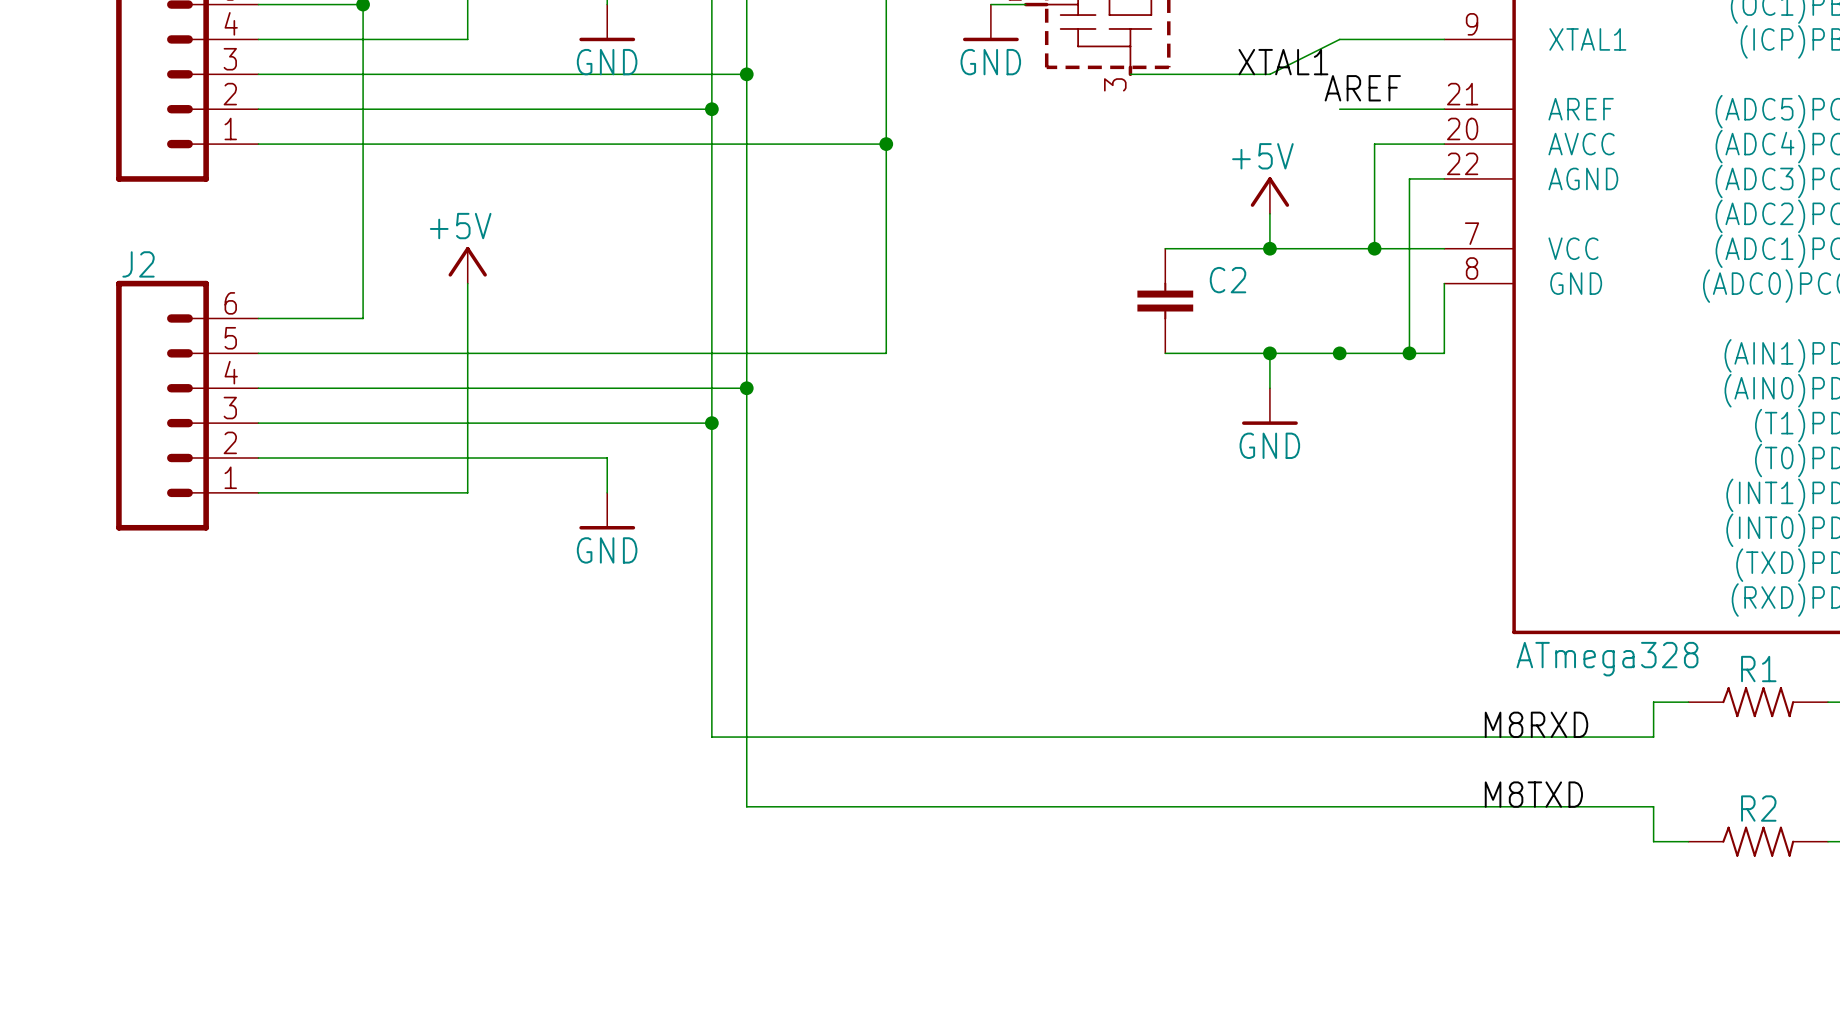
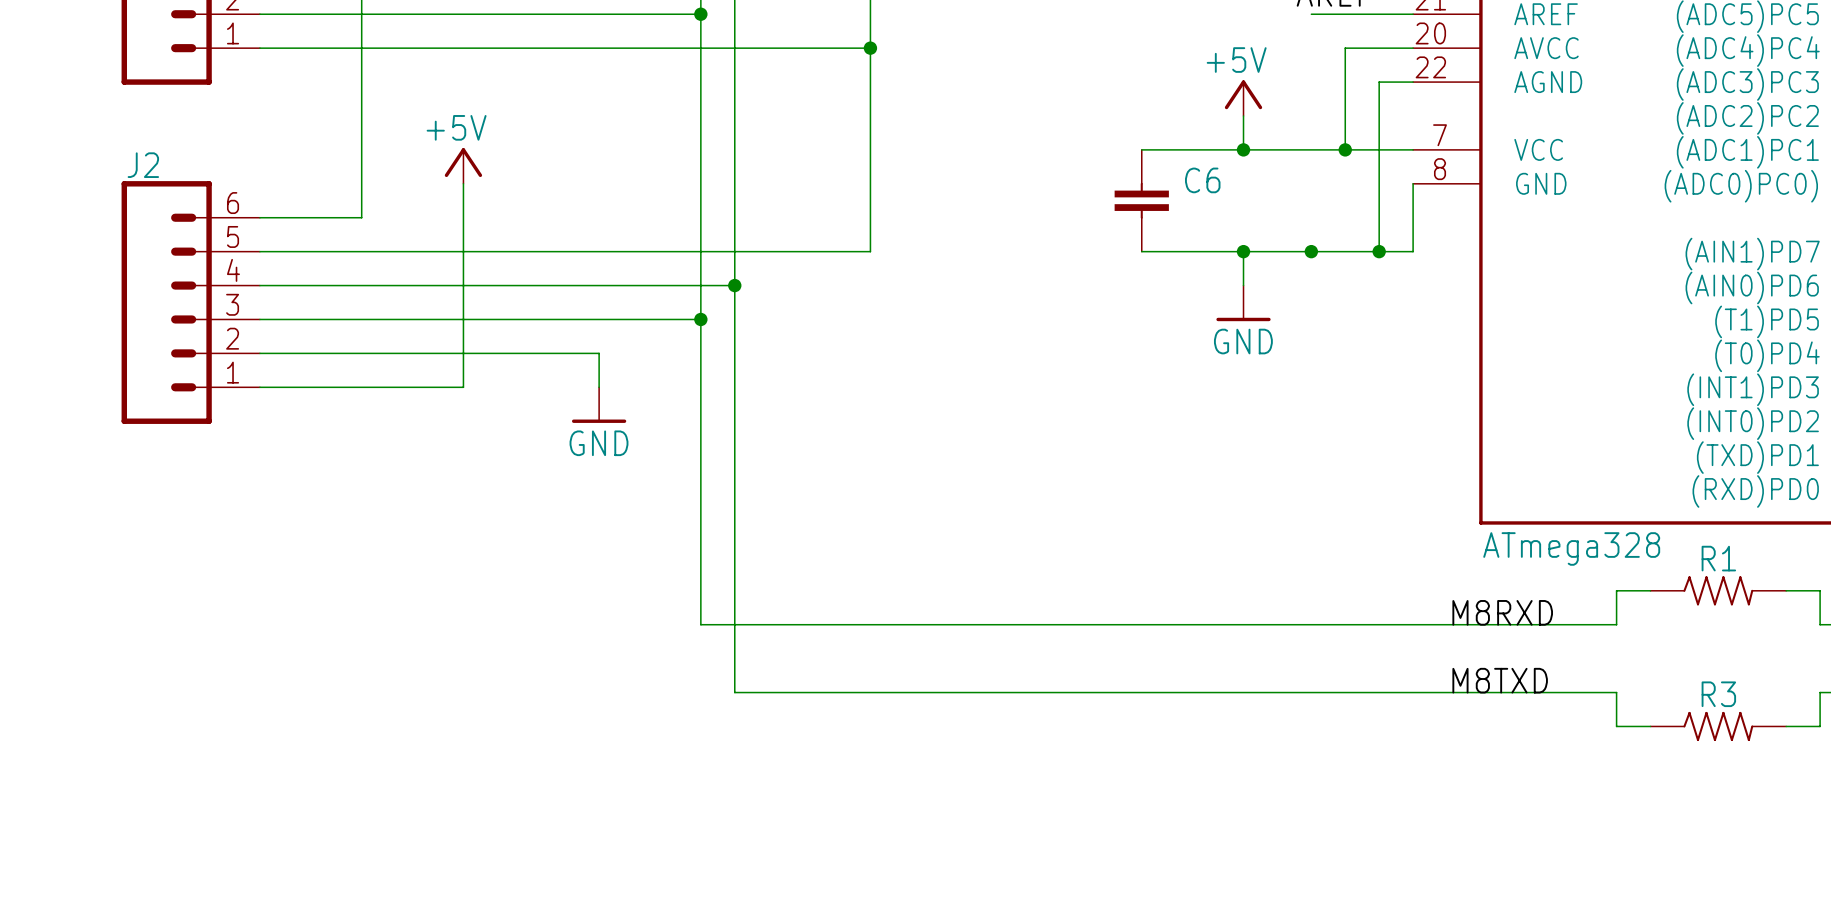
C2 name: C2 (1228, 280) -> C6 (1202, 180)
R2 name: R2 (1758, 808) -> R3 (1718, 694)

